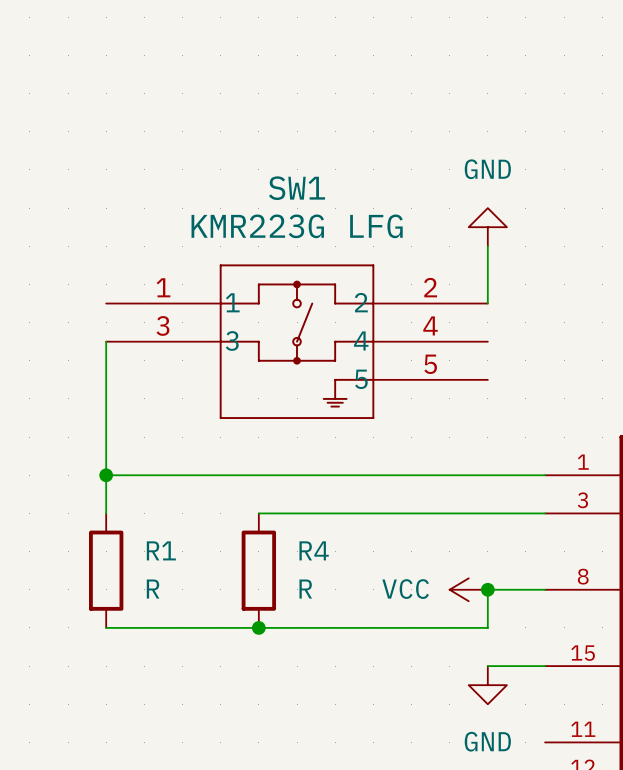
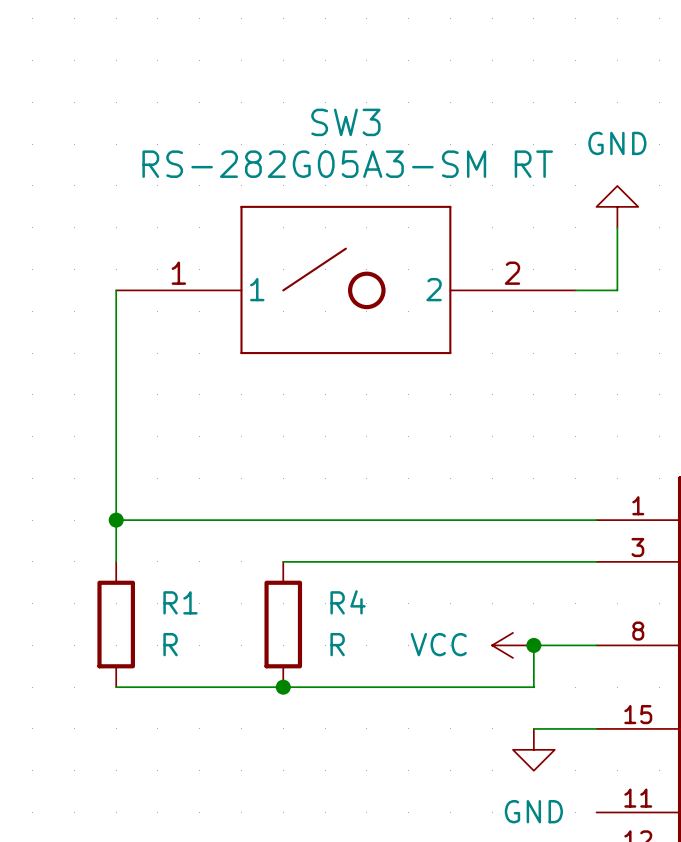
wire: none -> (617, 227) (617, 290) (575, 290)
power symbol position: GND (487, 227) -> GND (617, 206)
wire: (487, 246) (487, 303) -> none
SW3: none -> RS-282G05A3-SM RT (345, 279)
wire: none -> (116, 290) (116, 373)
SW1: KMR223G LFG (297, 341) -> none

